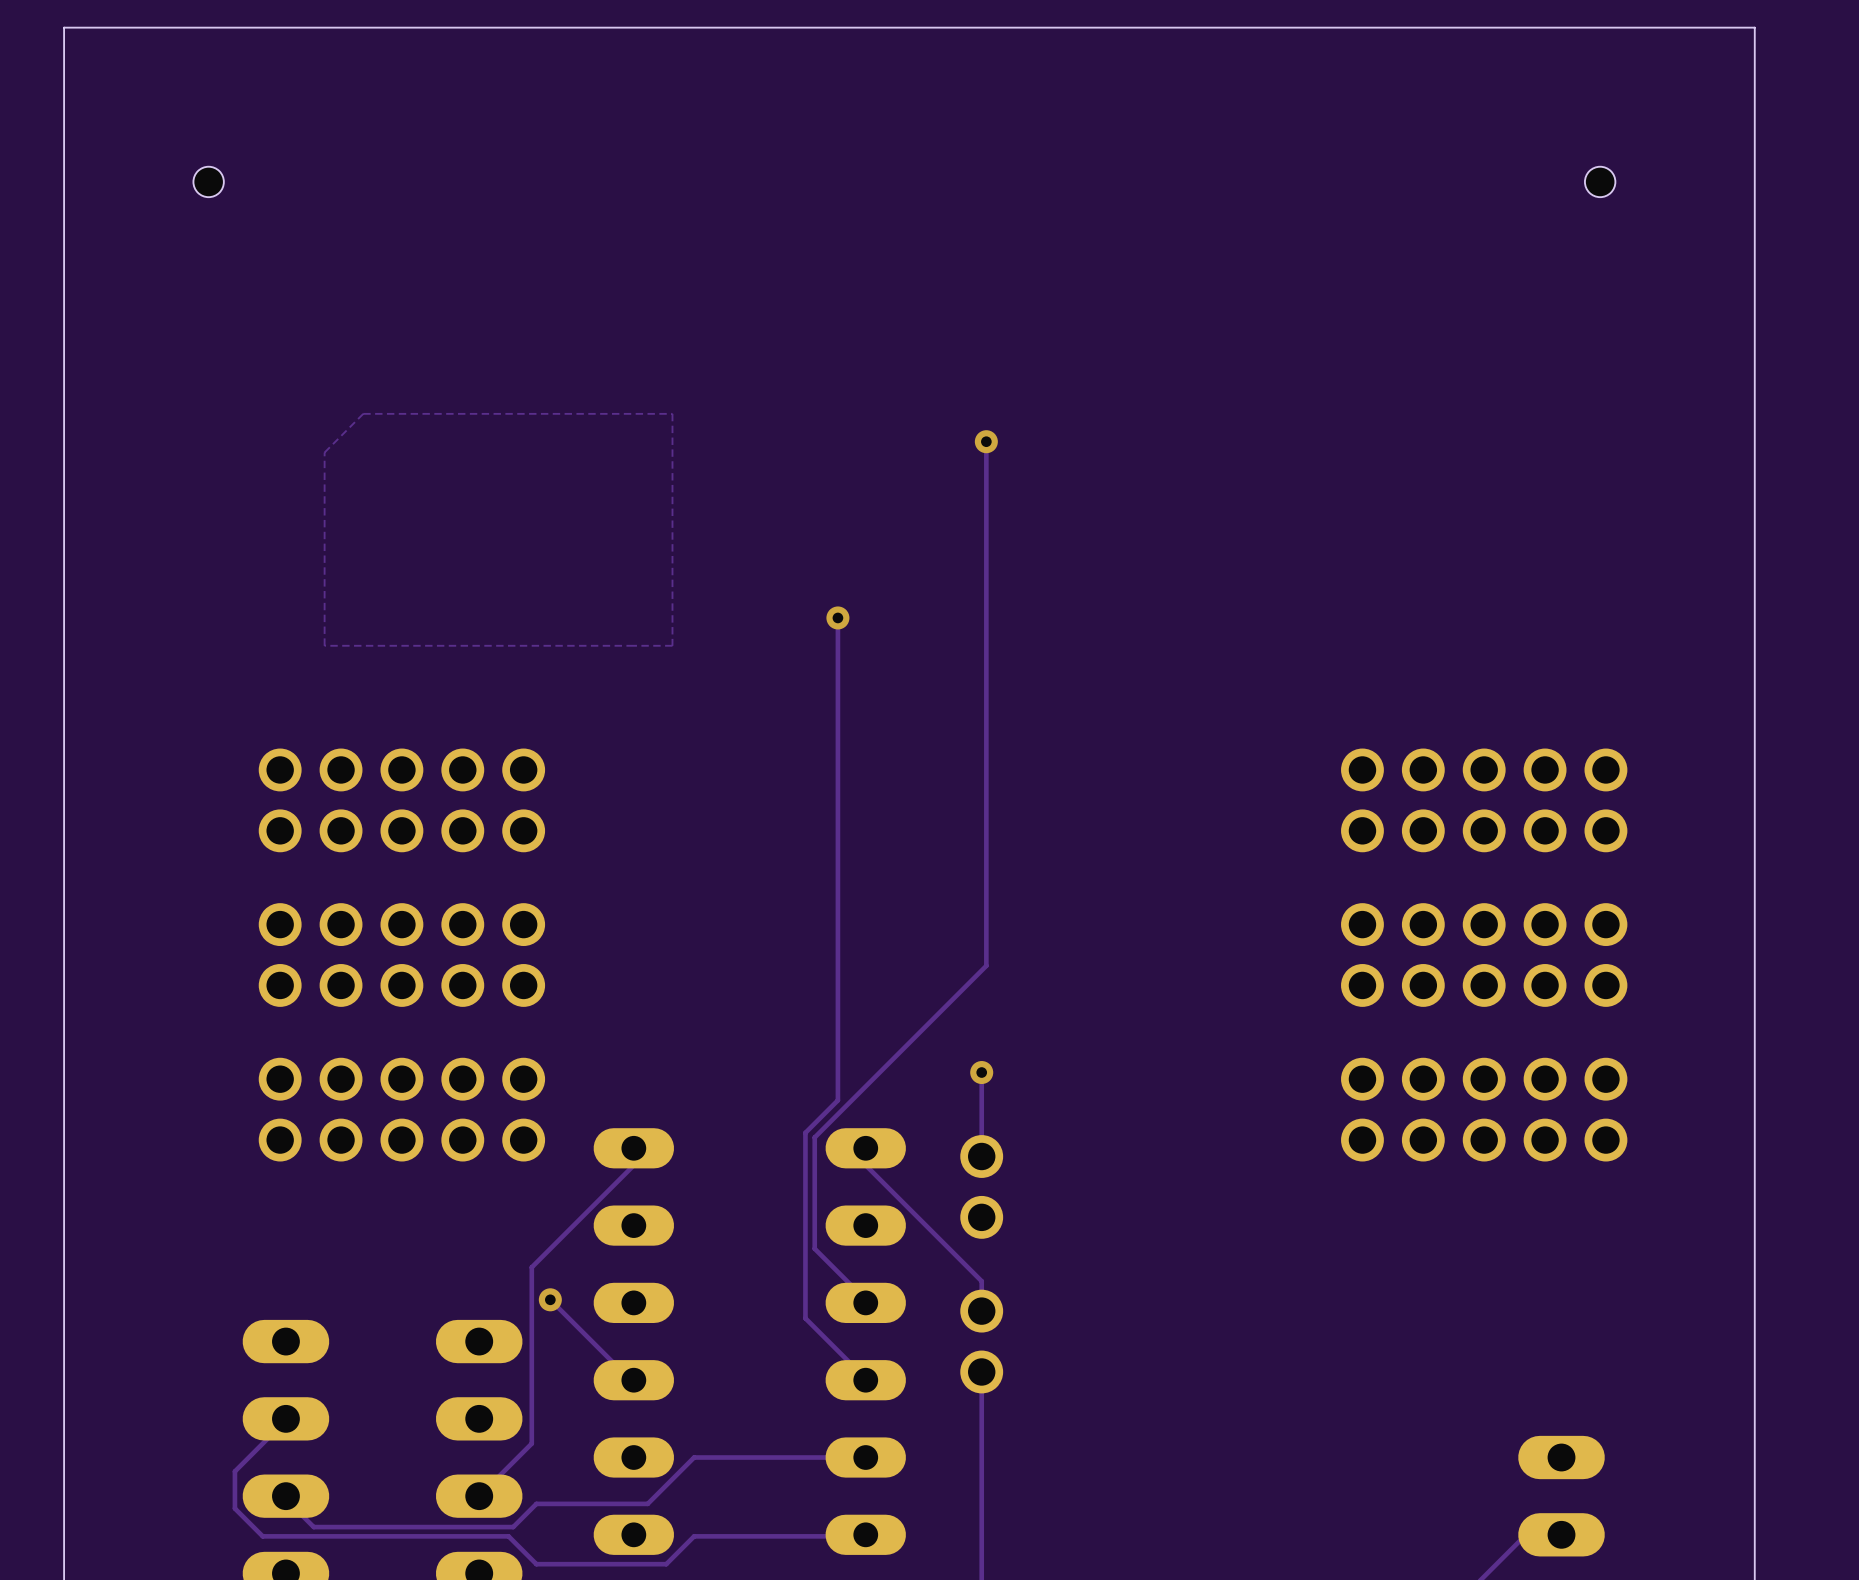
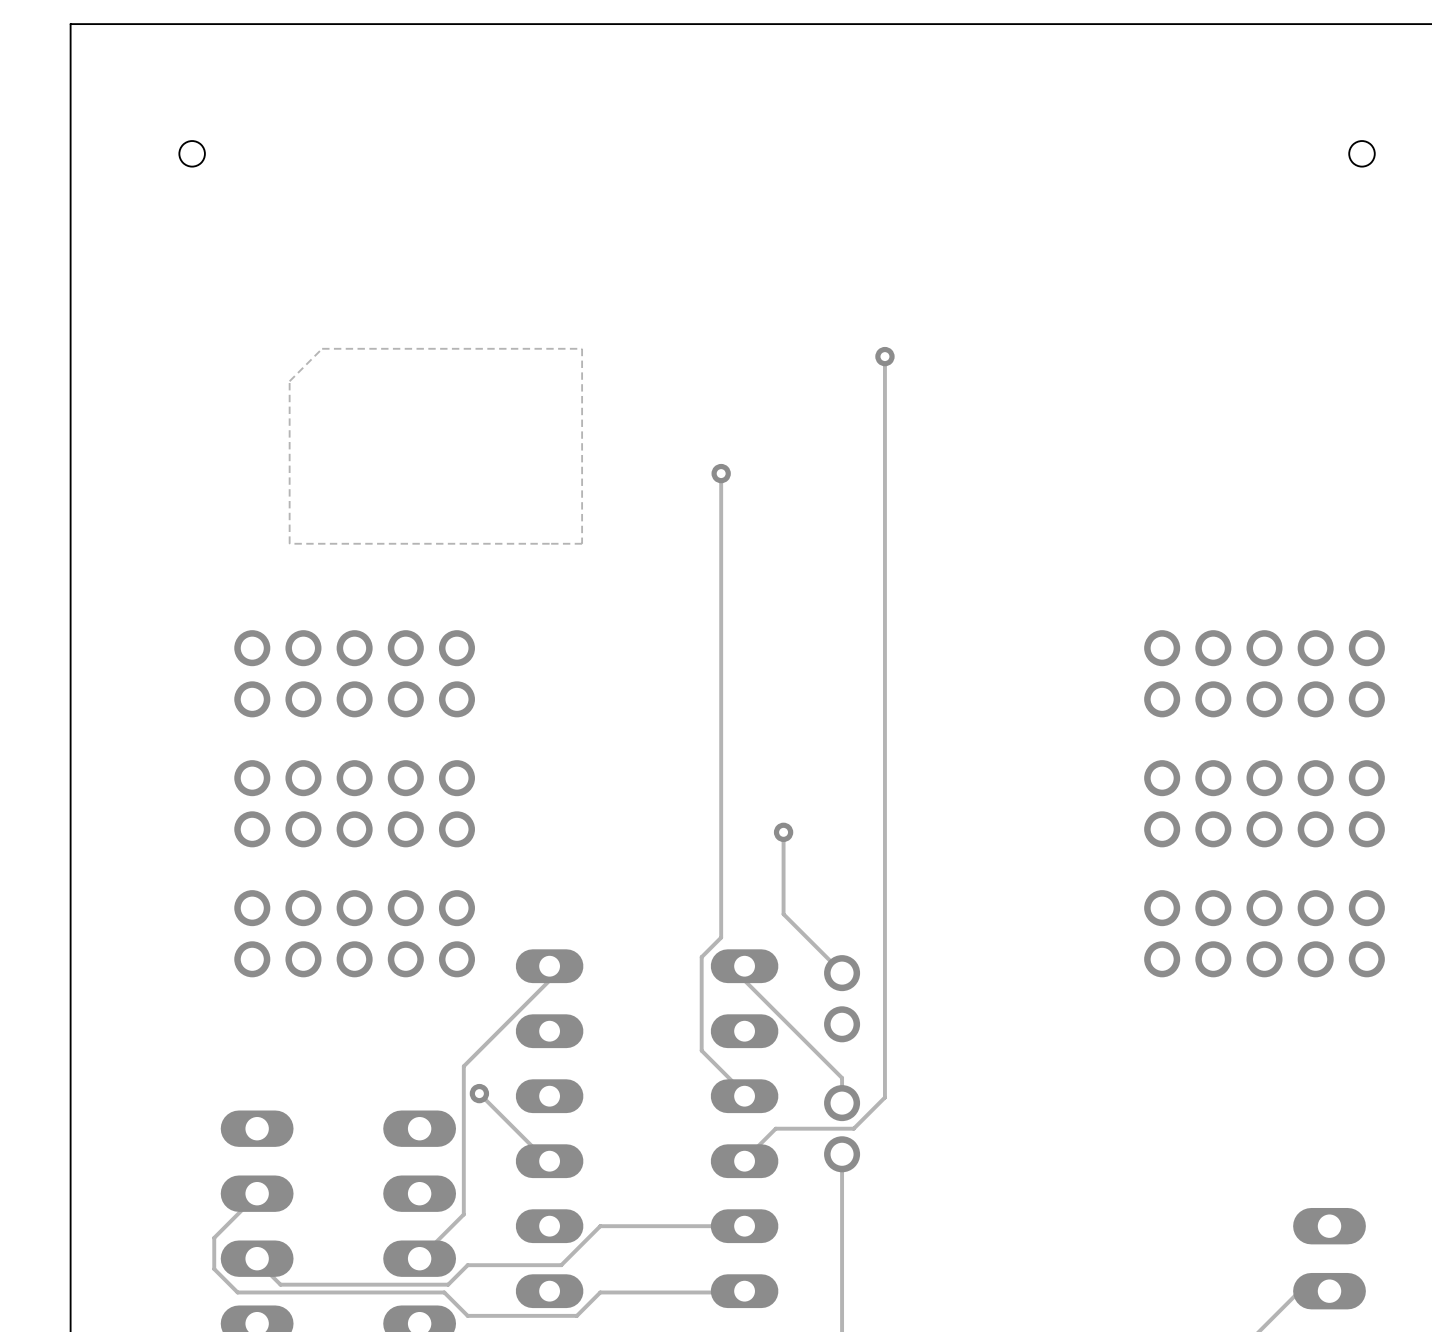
track: none -> (884, 356) (884, 1097) (853, 1128) (775, 1128) (744, 1159)
track: (986, 441) (986, 965) (837, 1114) -> none
via position: (986, 441) -> (884, 356)
track: none -> (721, 473) (721, 520)
via position: (837, 617) -> (721, 473)
track: (981, 1072) (981, 1156) -> (783, 832) (783, 914) (842, 972)
via position: (981, 1072) -> (783, 832)
track: (837, 1100) (805, 1132) (805, 1318) (865, 1378) -> (721, 925) (721, 937)

